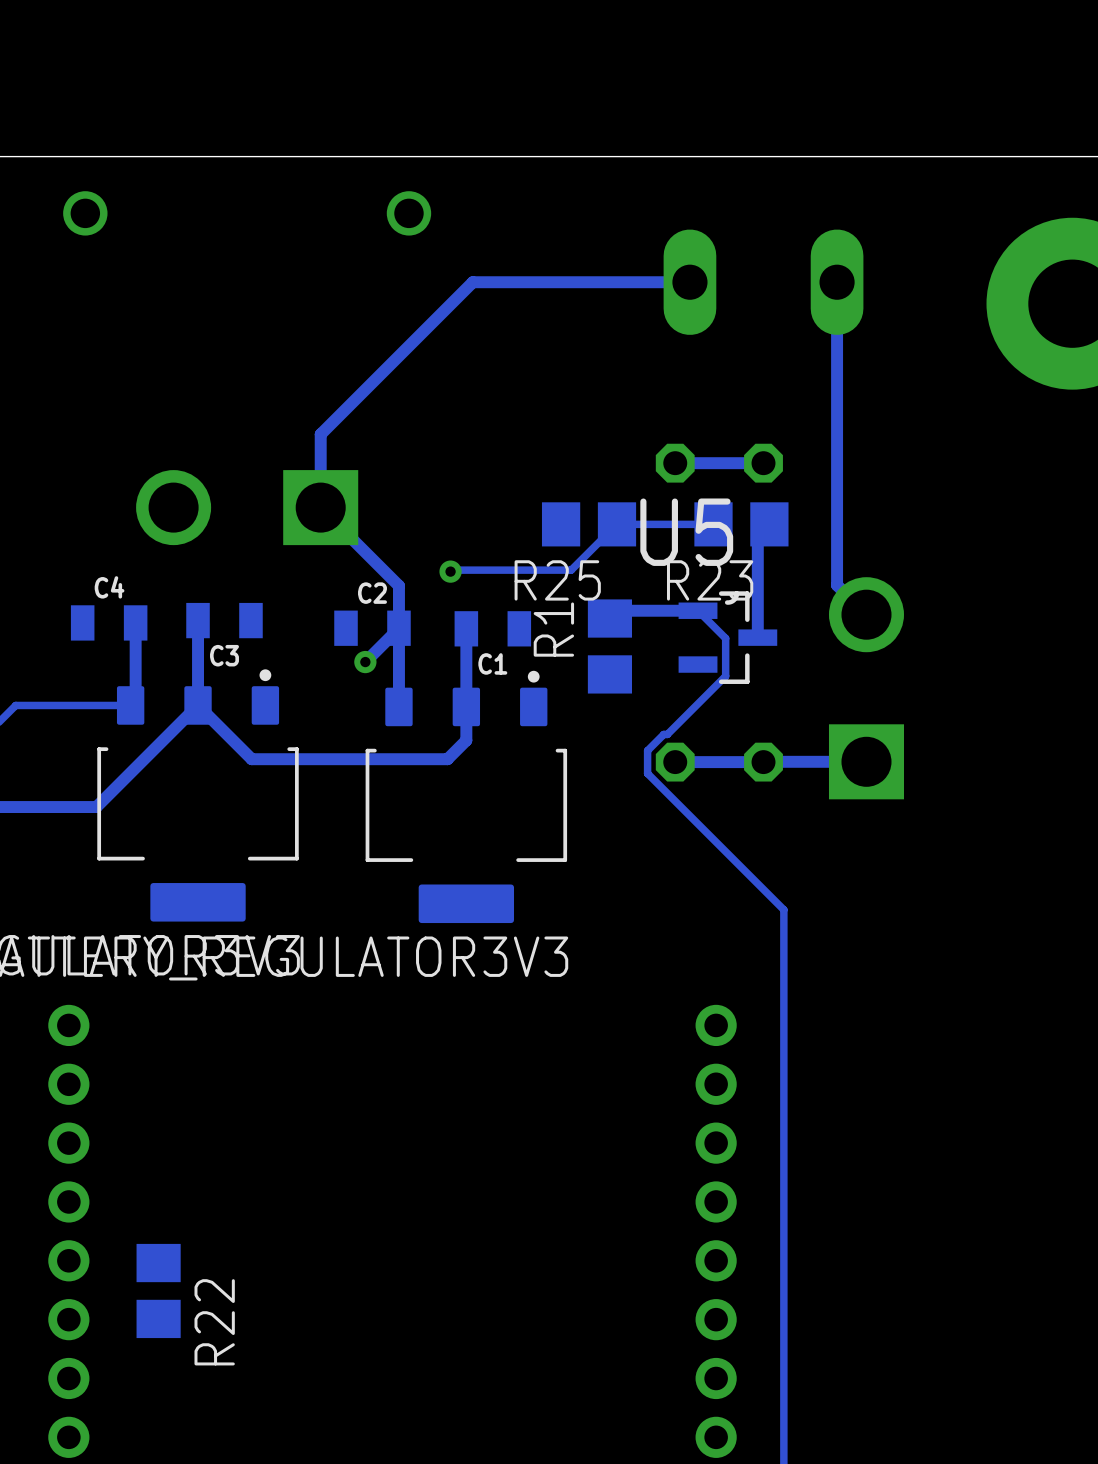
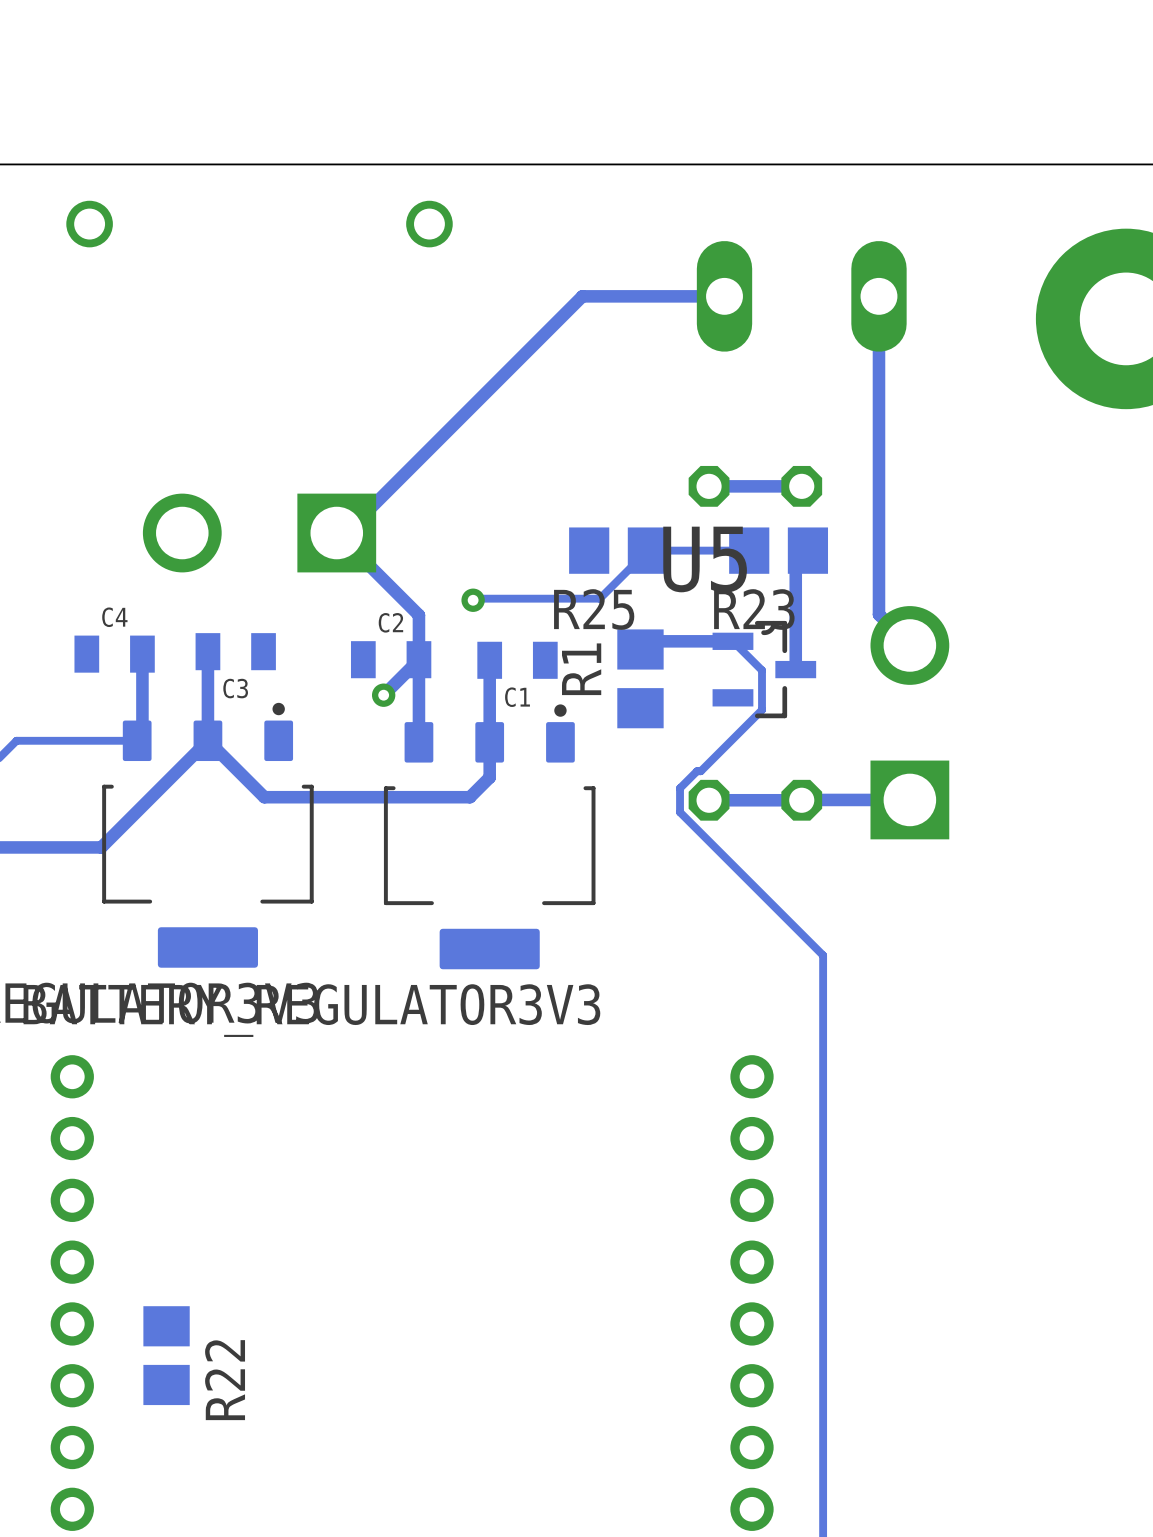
track: (554, 282) (472, 282) (320, 434) (320, 507) -> (582, 296) (341, 537)

